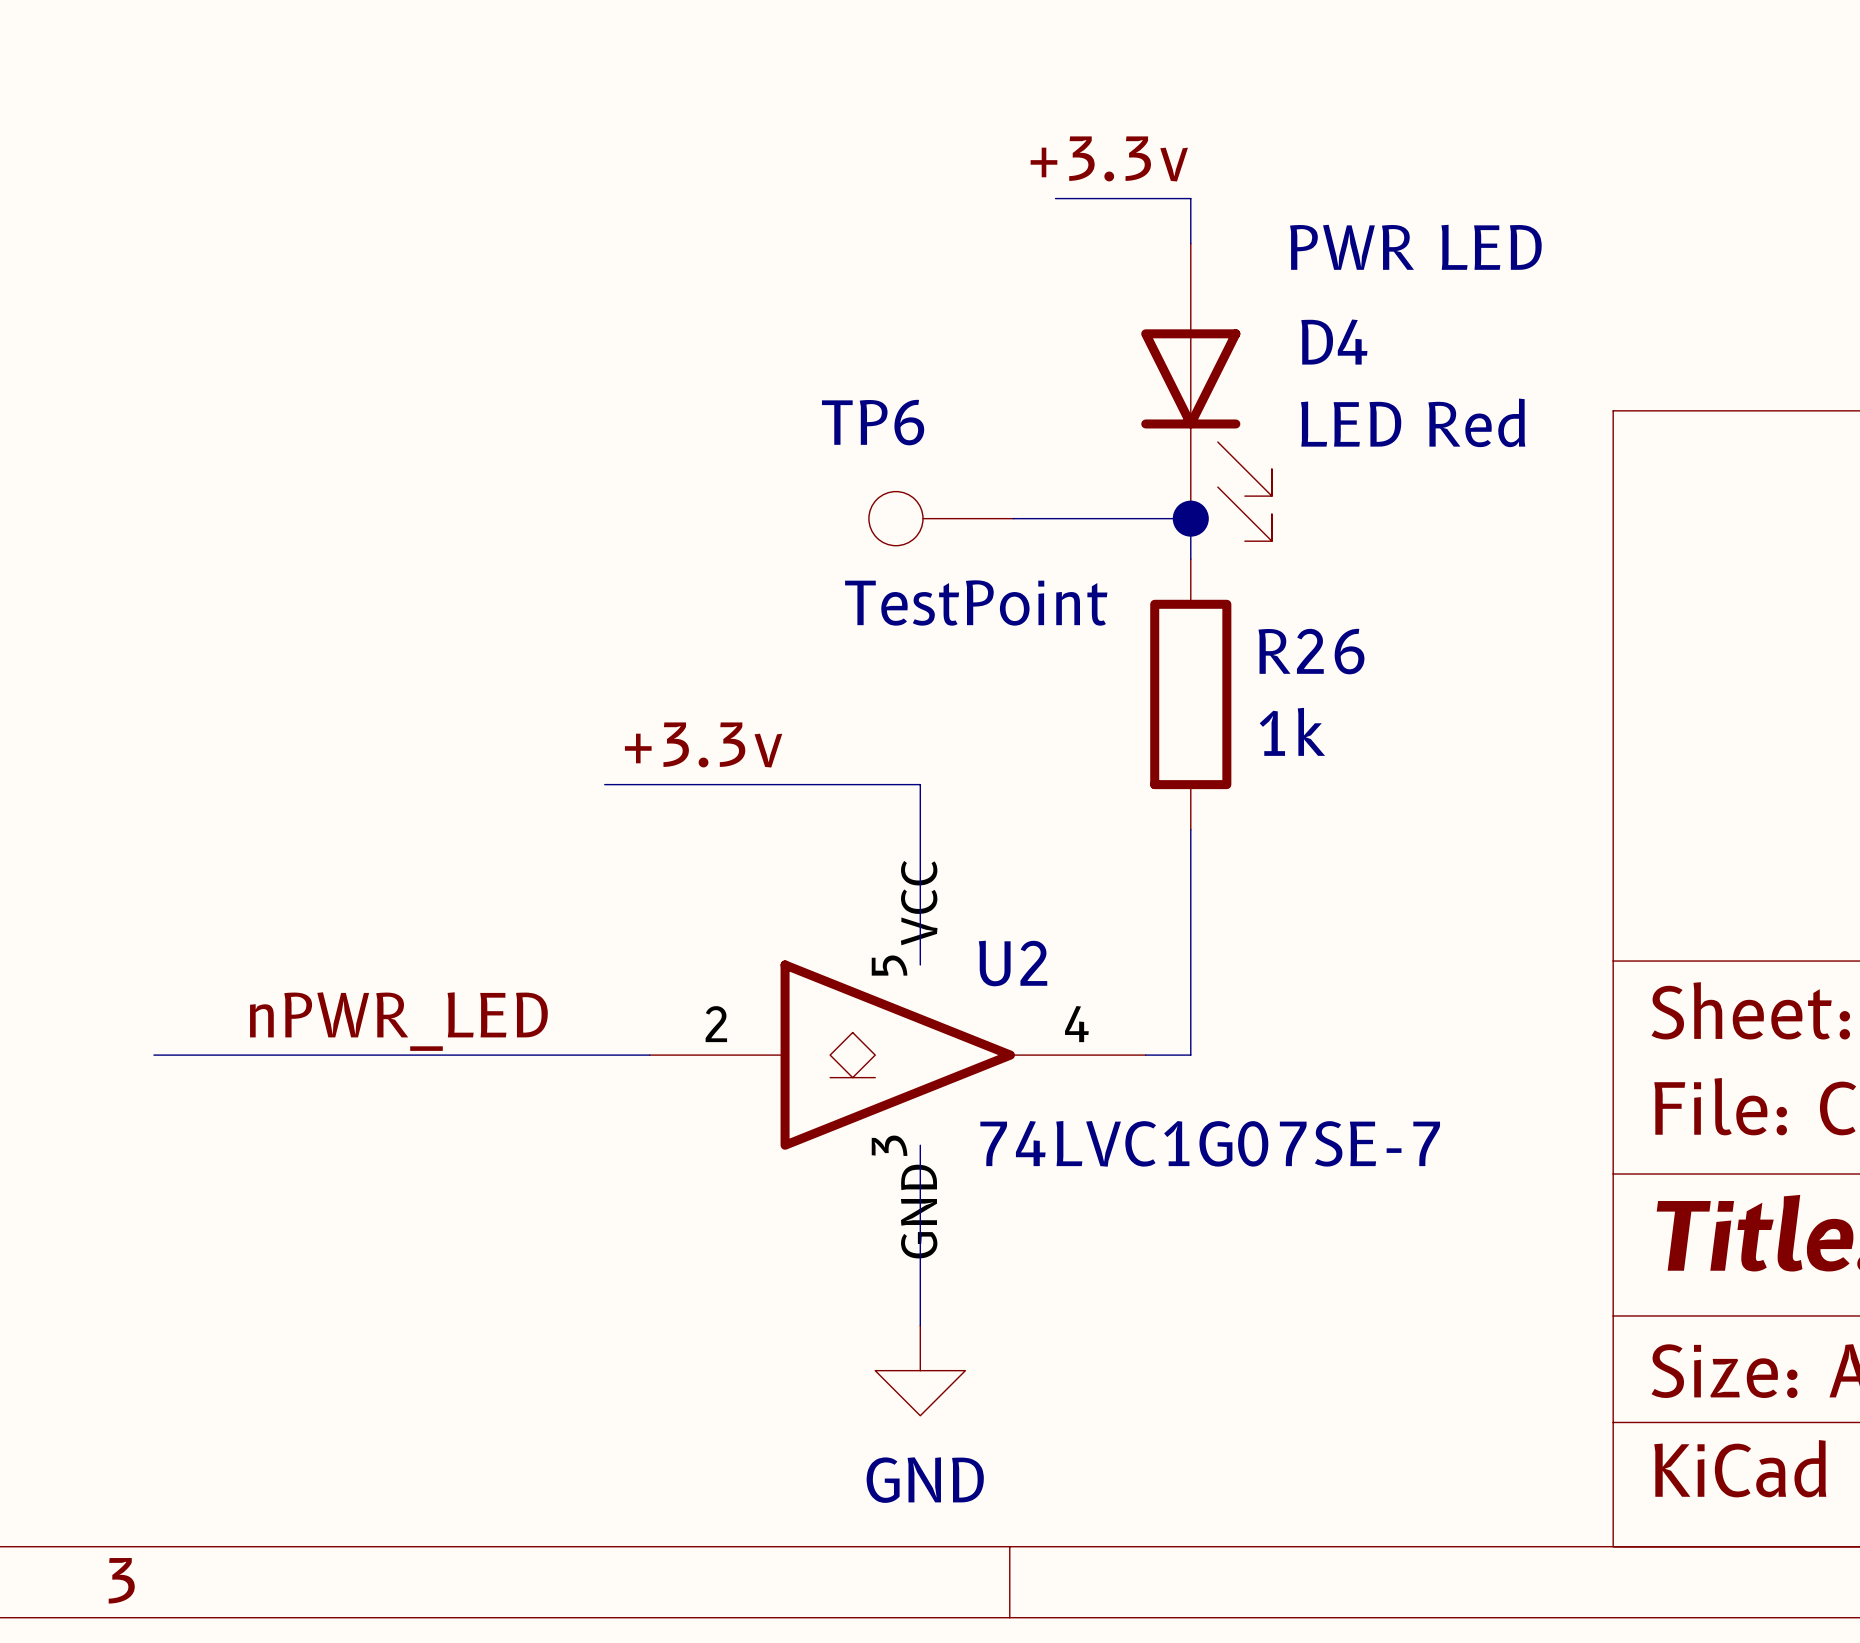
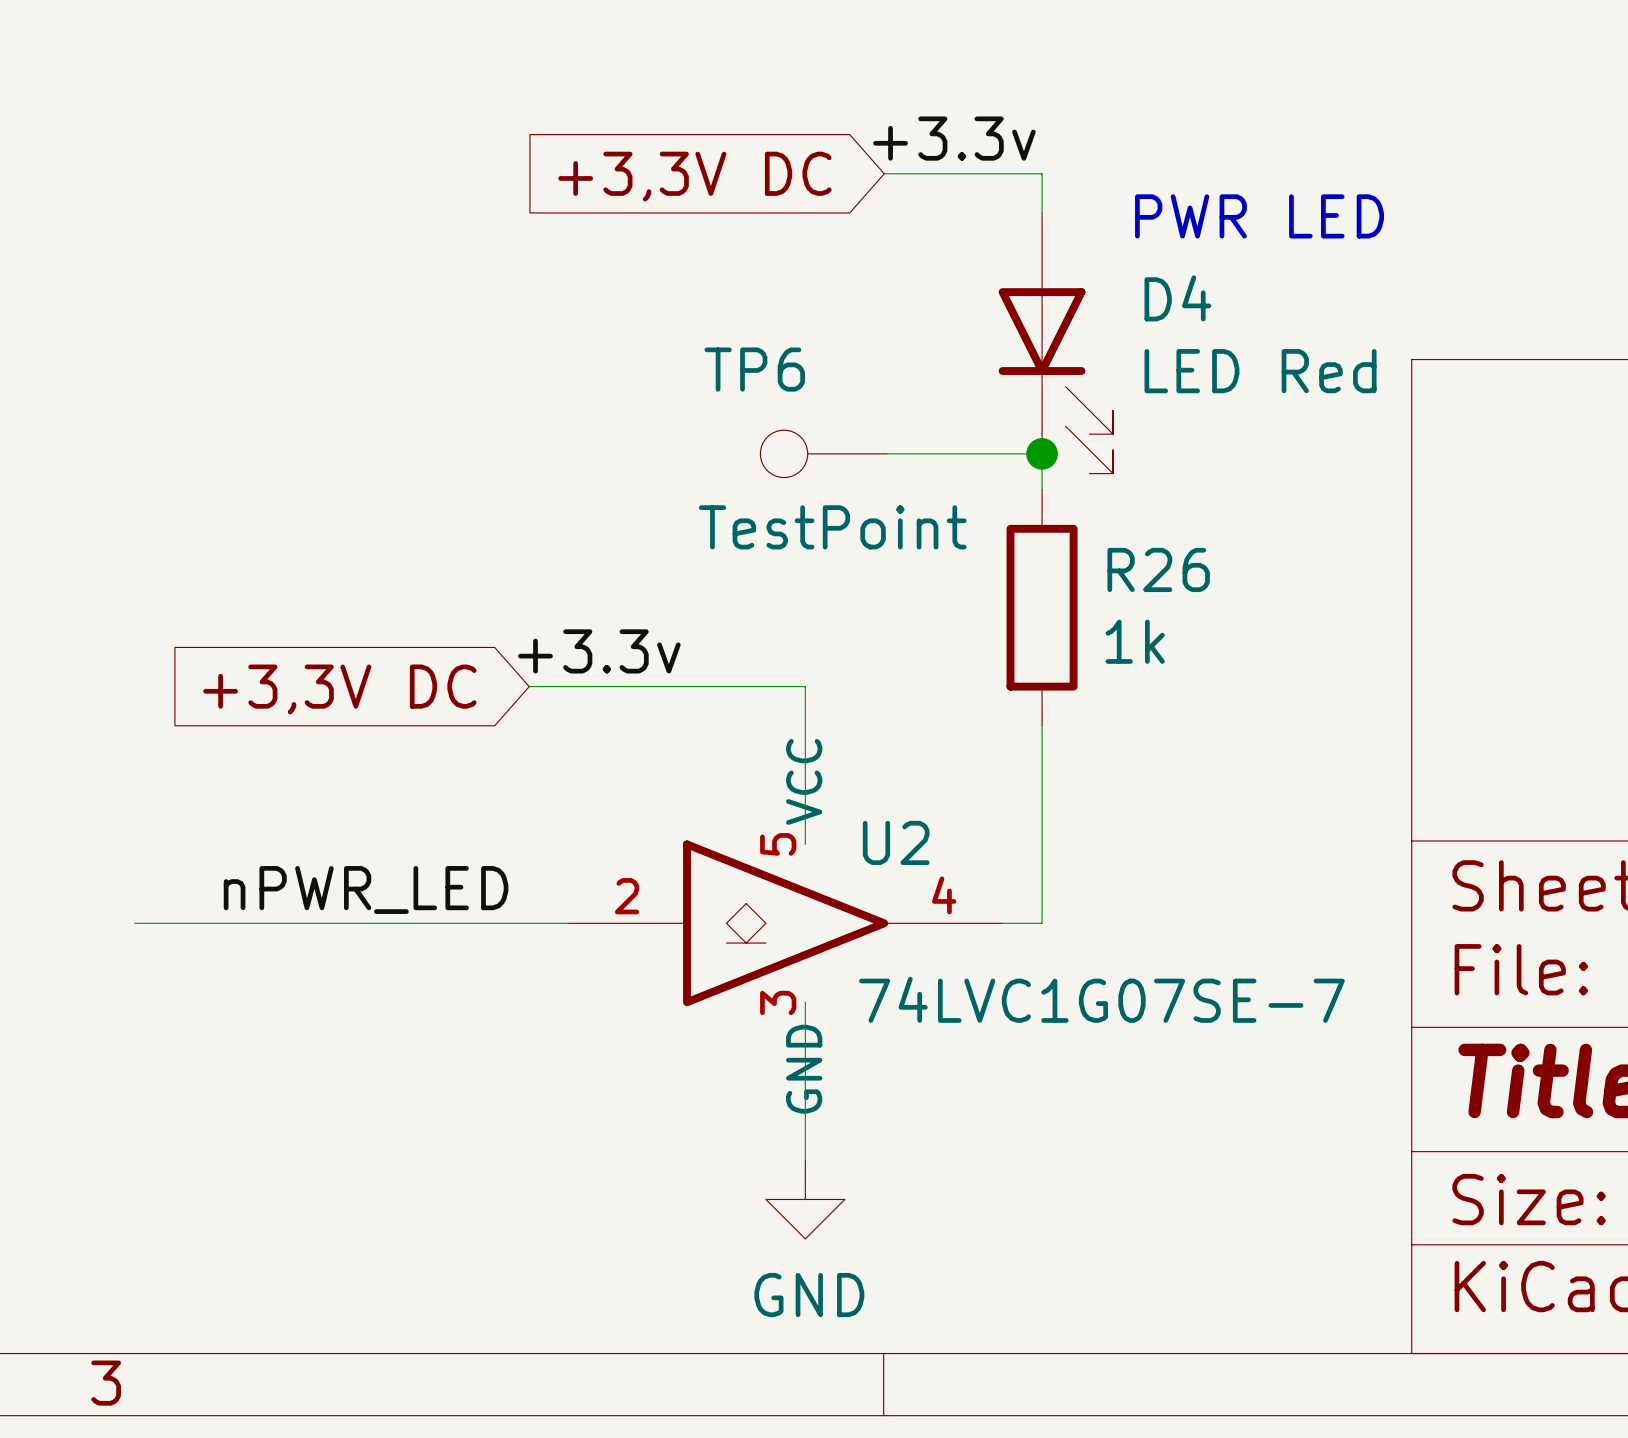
wire: none -> (884, 173) (923, 173)
global label: none -> +3,3V DC (694, 176)
global label: none -> +3,3V DC (339, 689)

